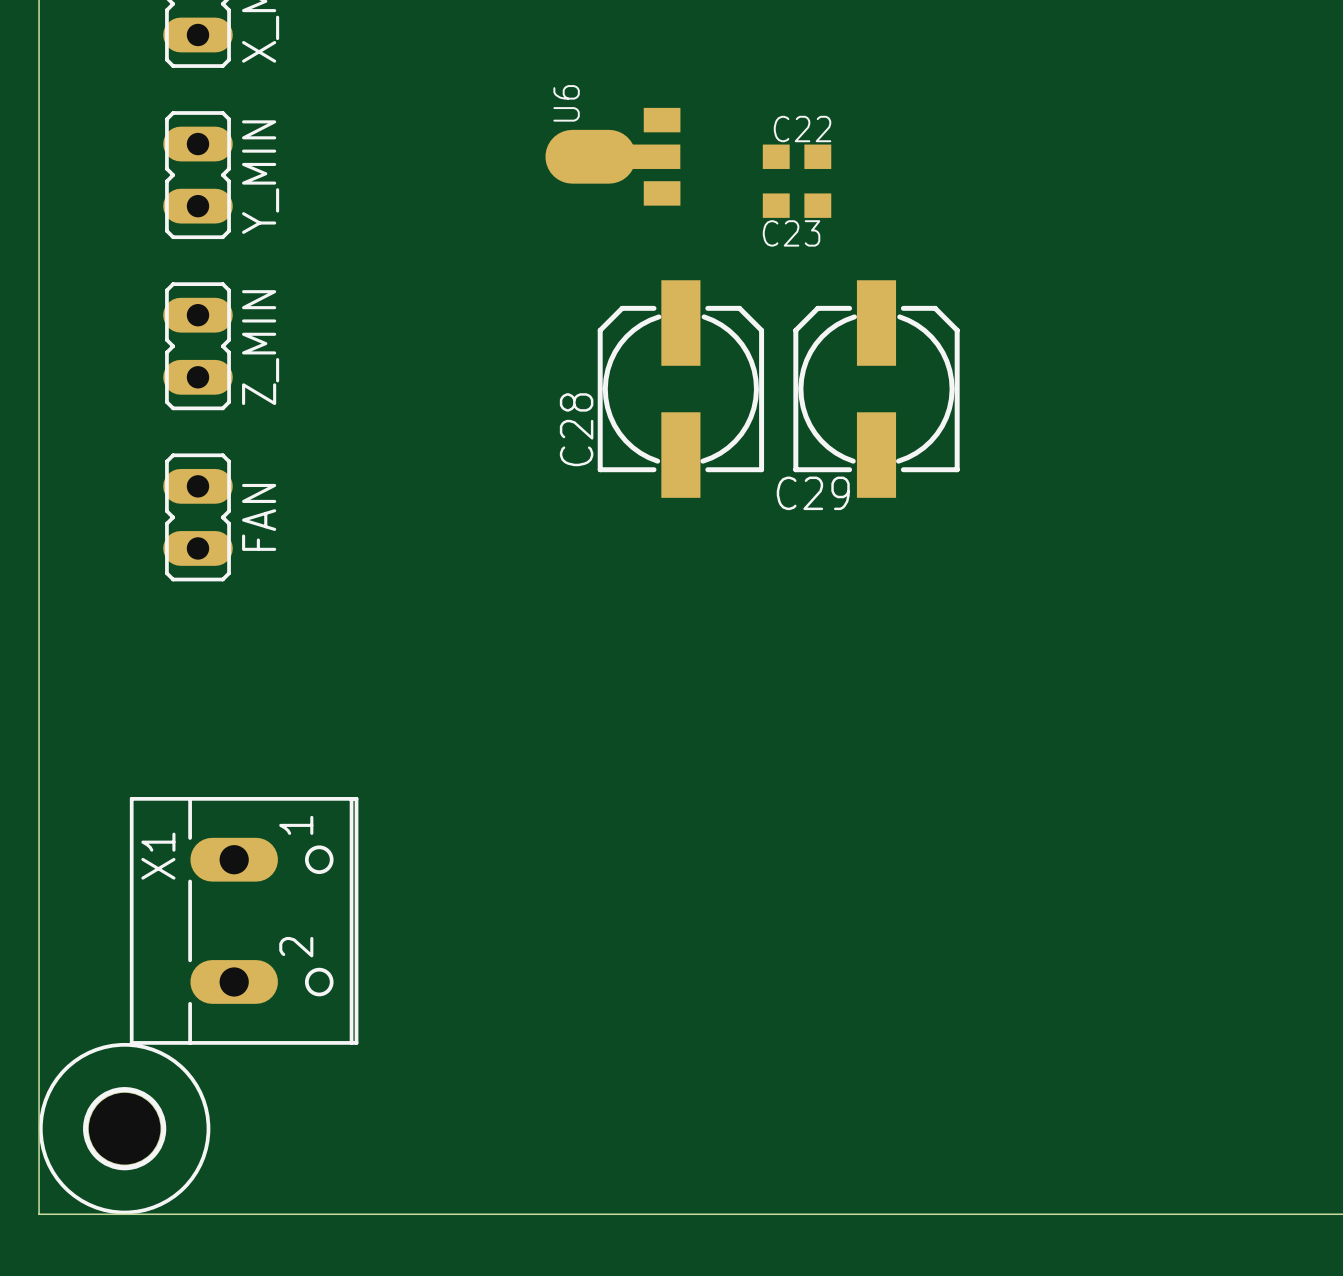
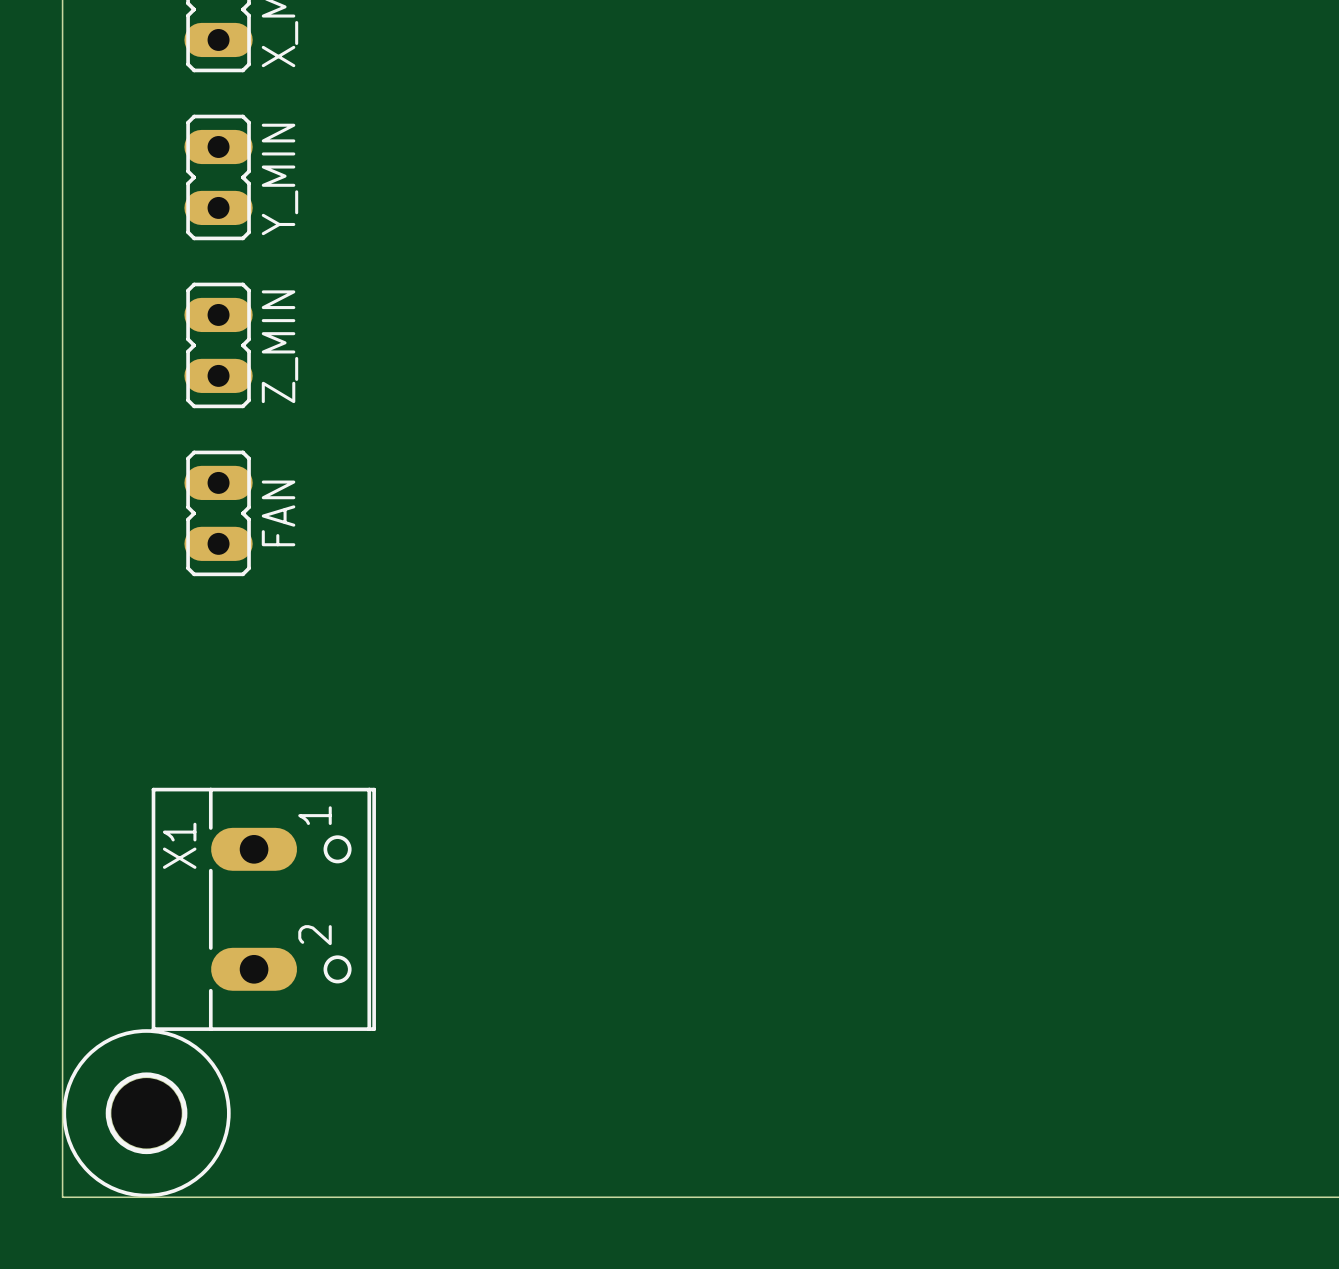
U6: (612, 156) -> none
C22: (797, 156) -> none
C23: (797, 205) -> none
C28: (680, 389) -> none
C29: (876, 389) -> none

